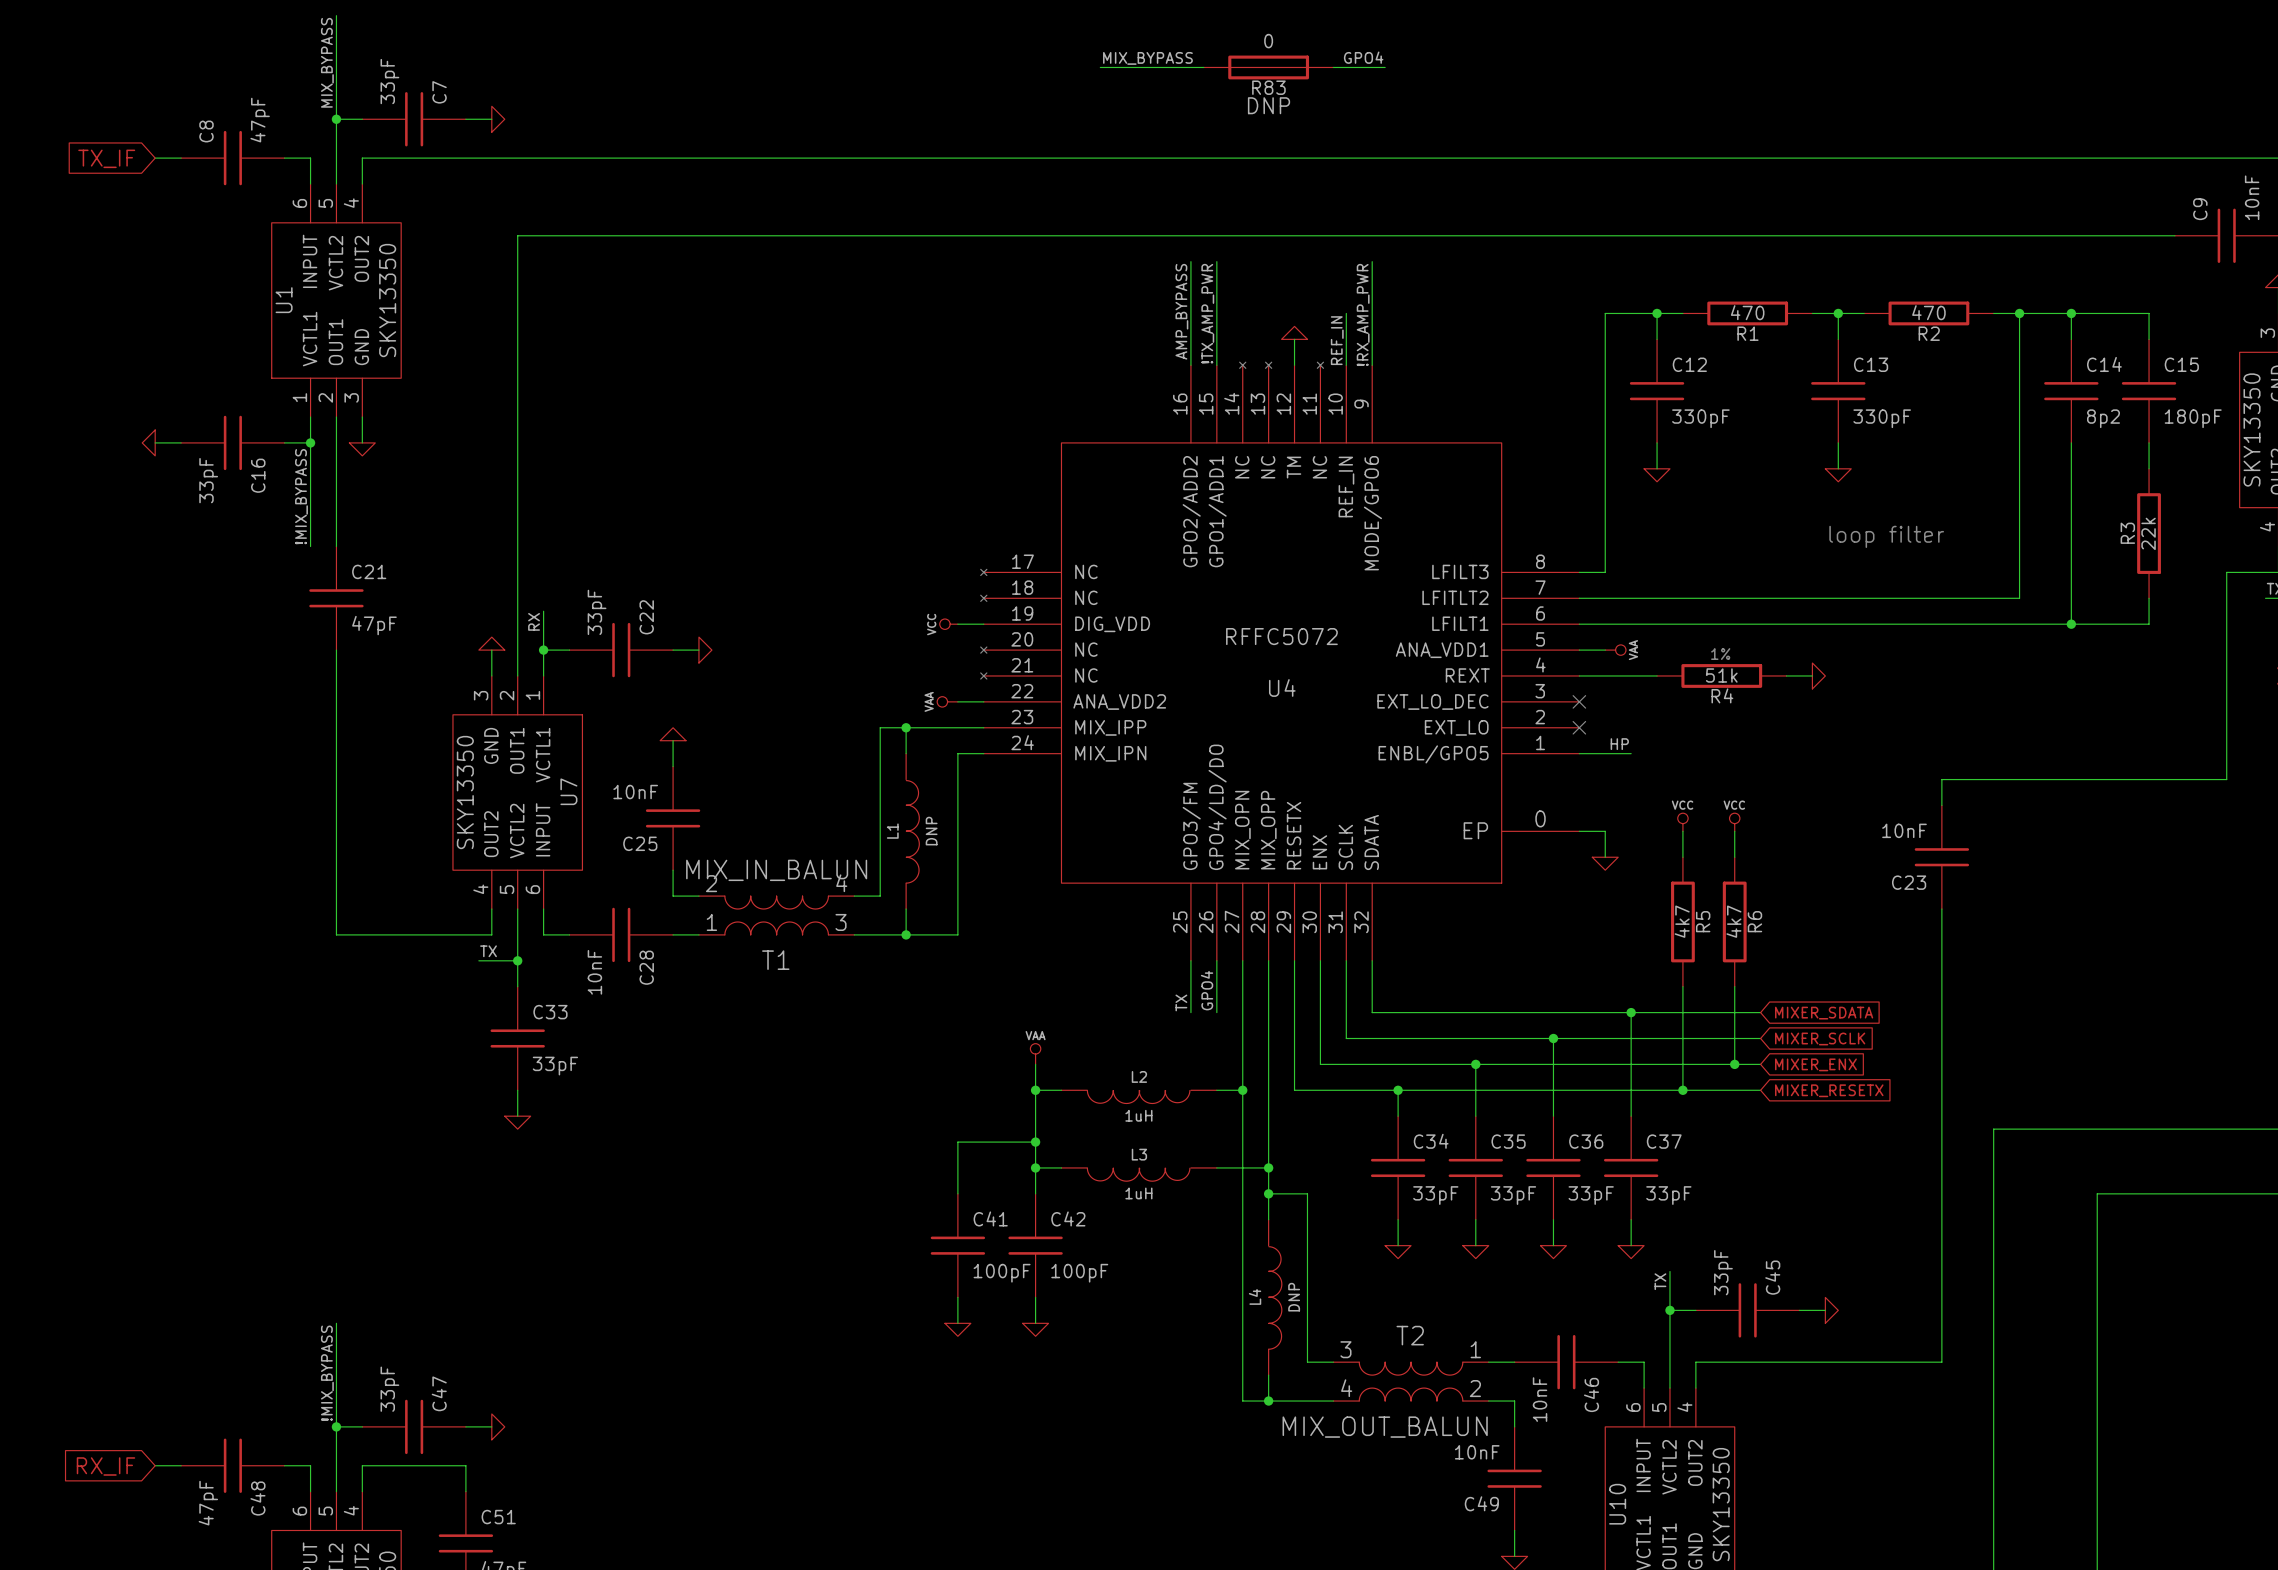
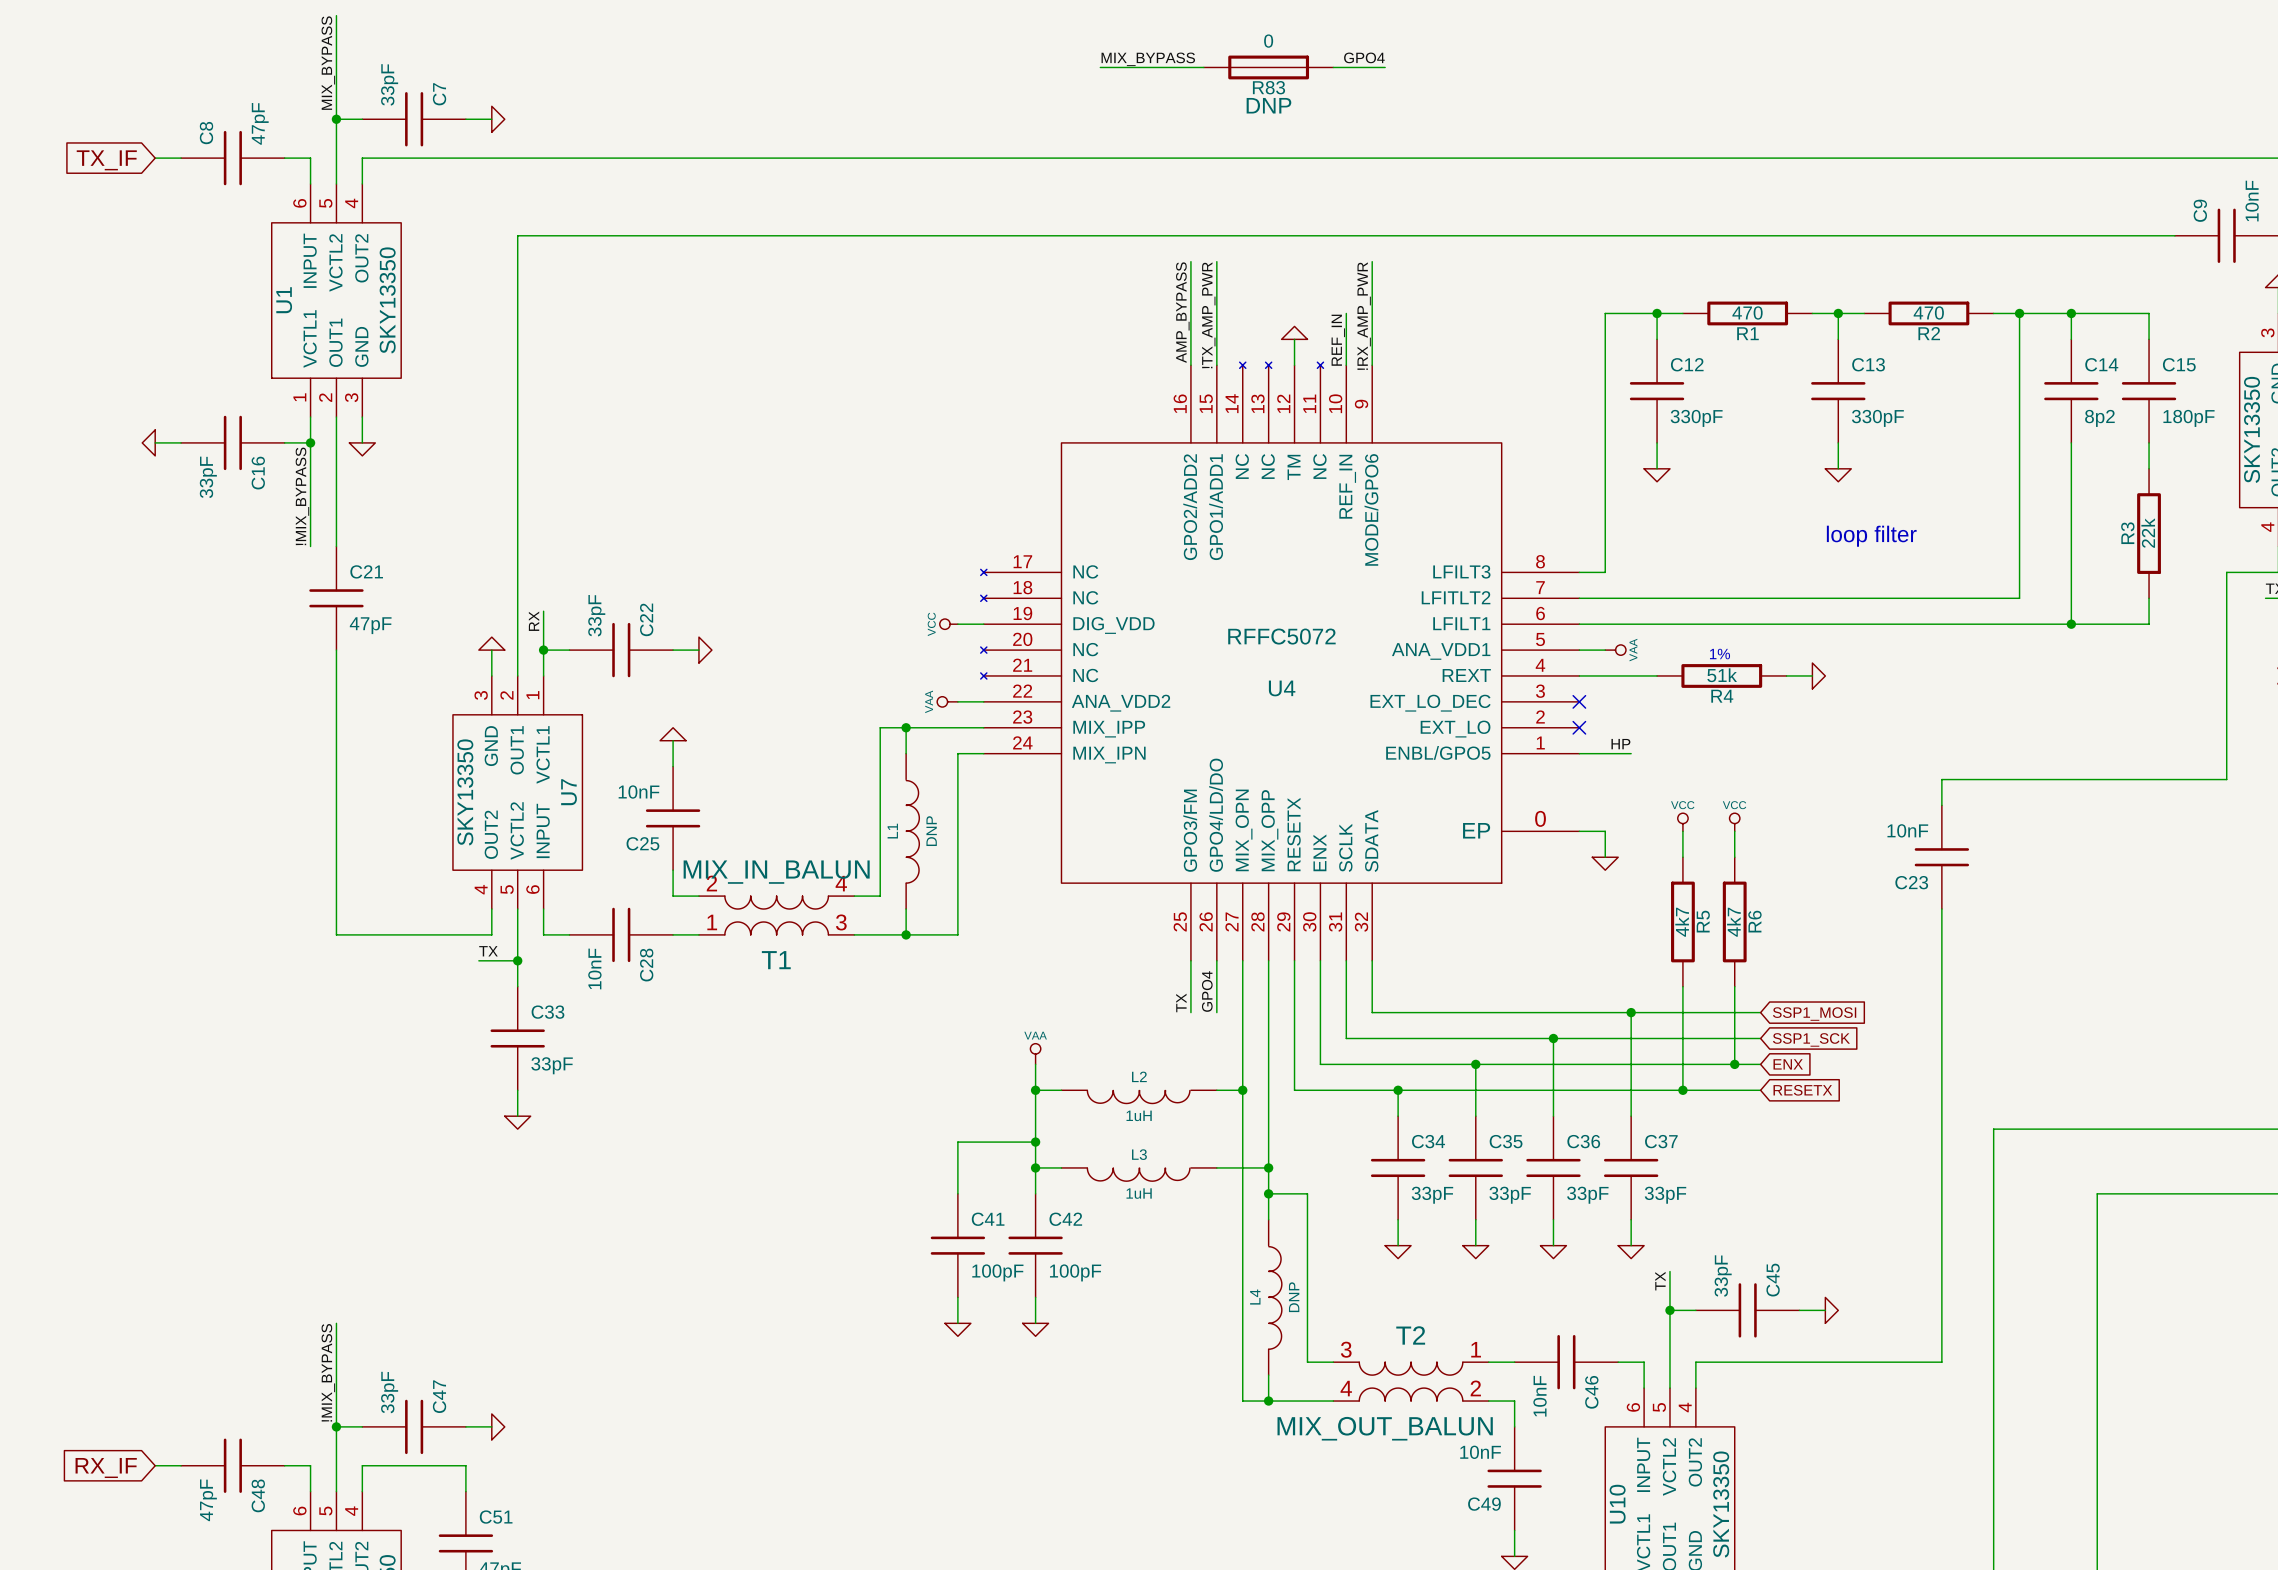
global label: MIXER_SDATA (1824, 1013) -> SSP1_MOSI (1814, 1014)
global label: MIXER_SCLK (1820, 1038) -> SSP1_SCK (1811, 1039)
global label: MIXER_ENX (1815, 1064) -> ENX (1788, 1064)
global label: MIXER_RESETX (1829, 1090) -> RESETX (1802, 1090)

